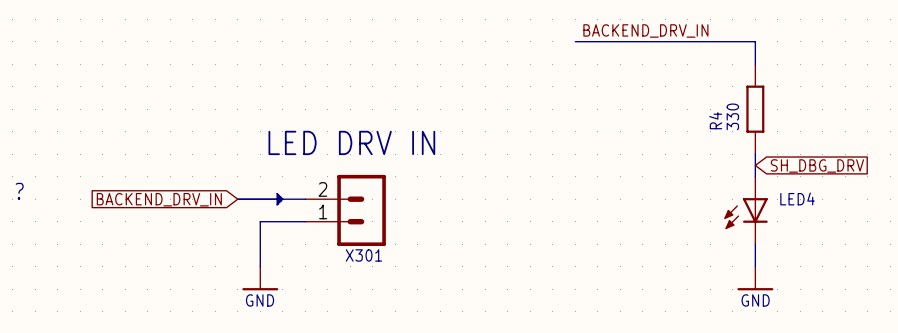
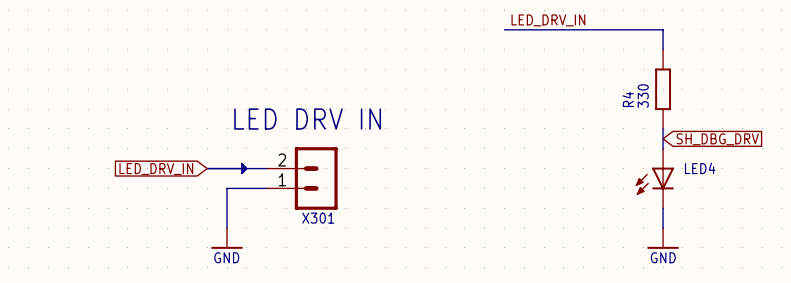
label: BACKEND_DRV_IN (645, 30) -> LED_DRV_IN (548, 20)
text: ? (19, 191) -> none
global label: BACKEND_DRV_IN (159, 199) -> LED_DRV_IN (156, 169)

